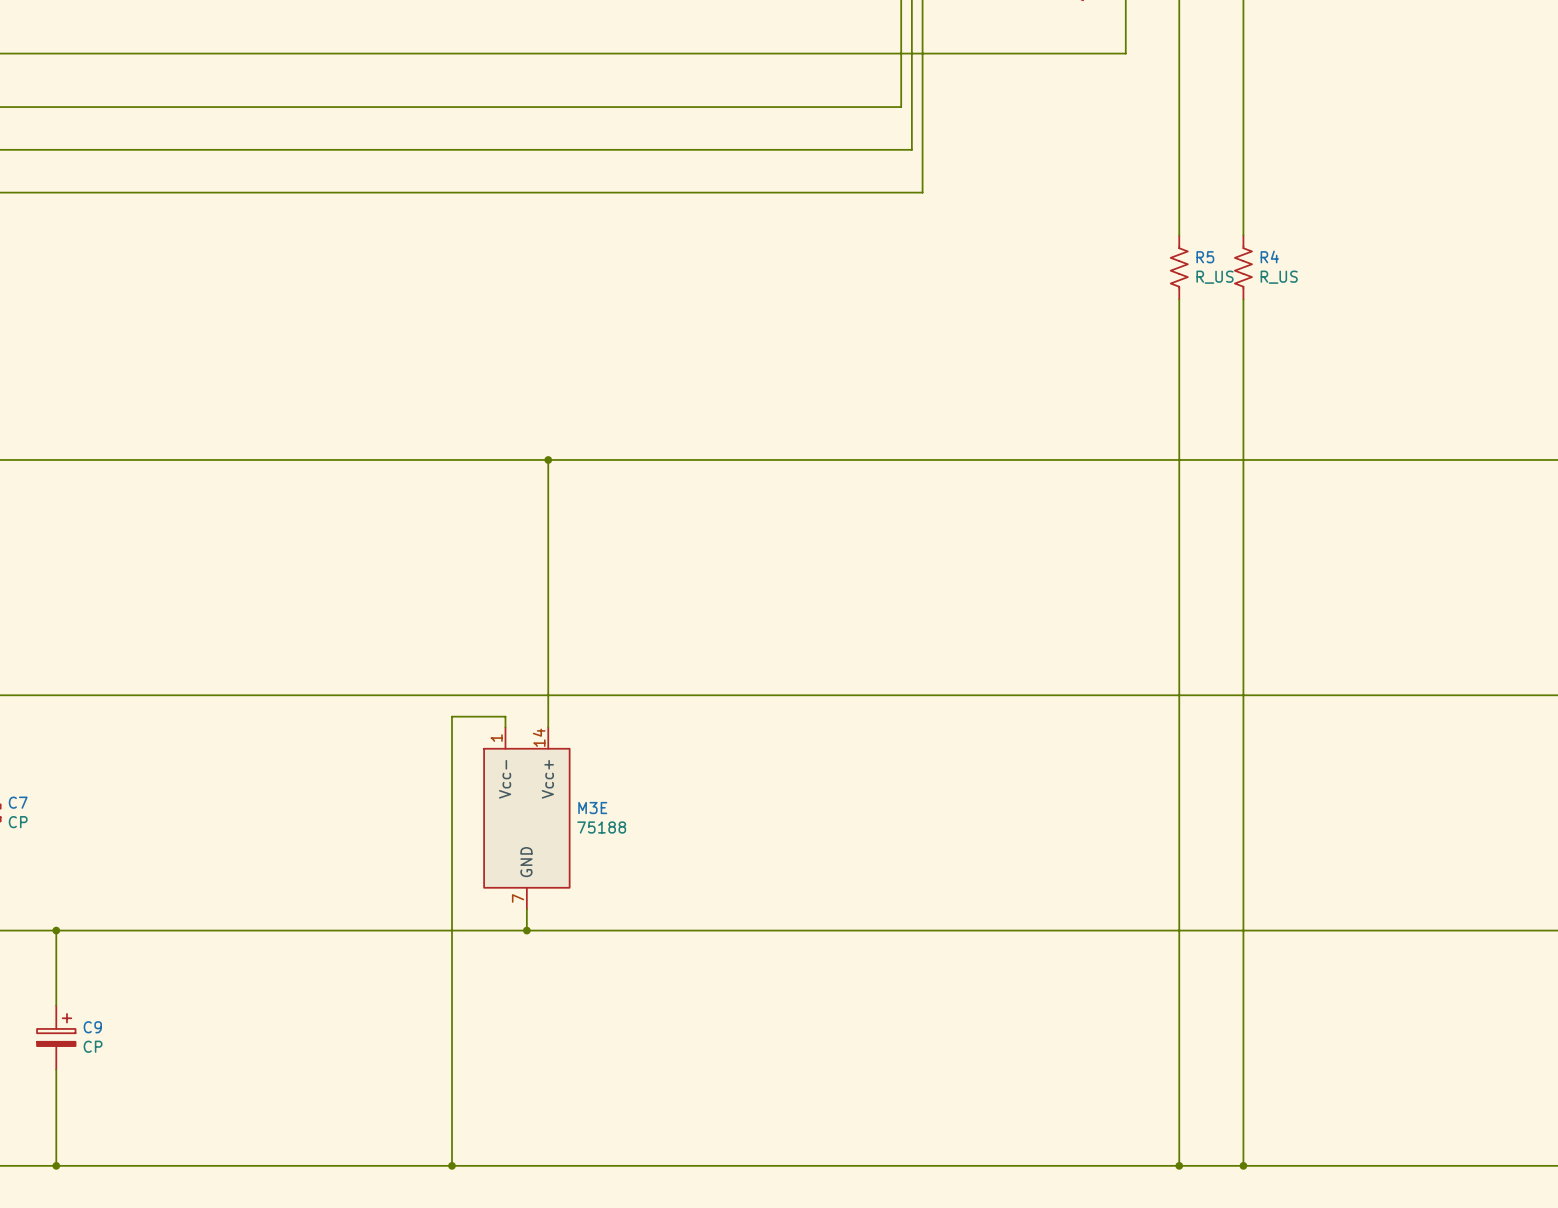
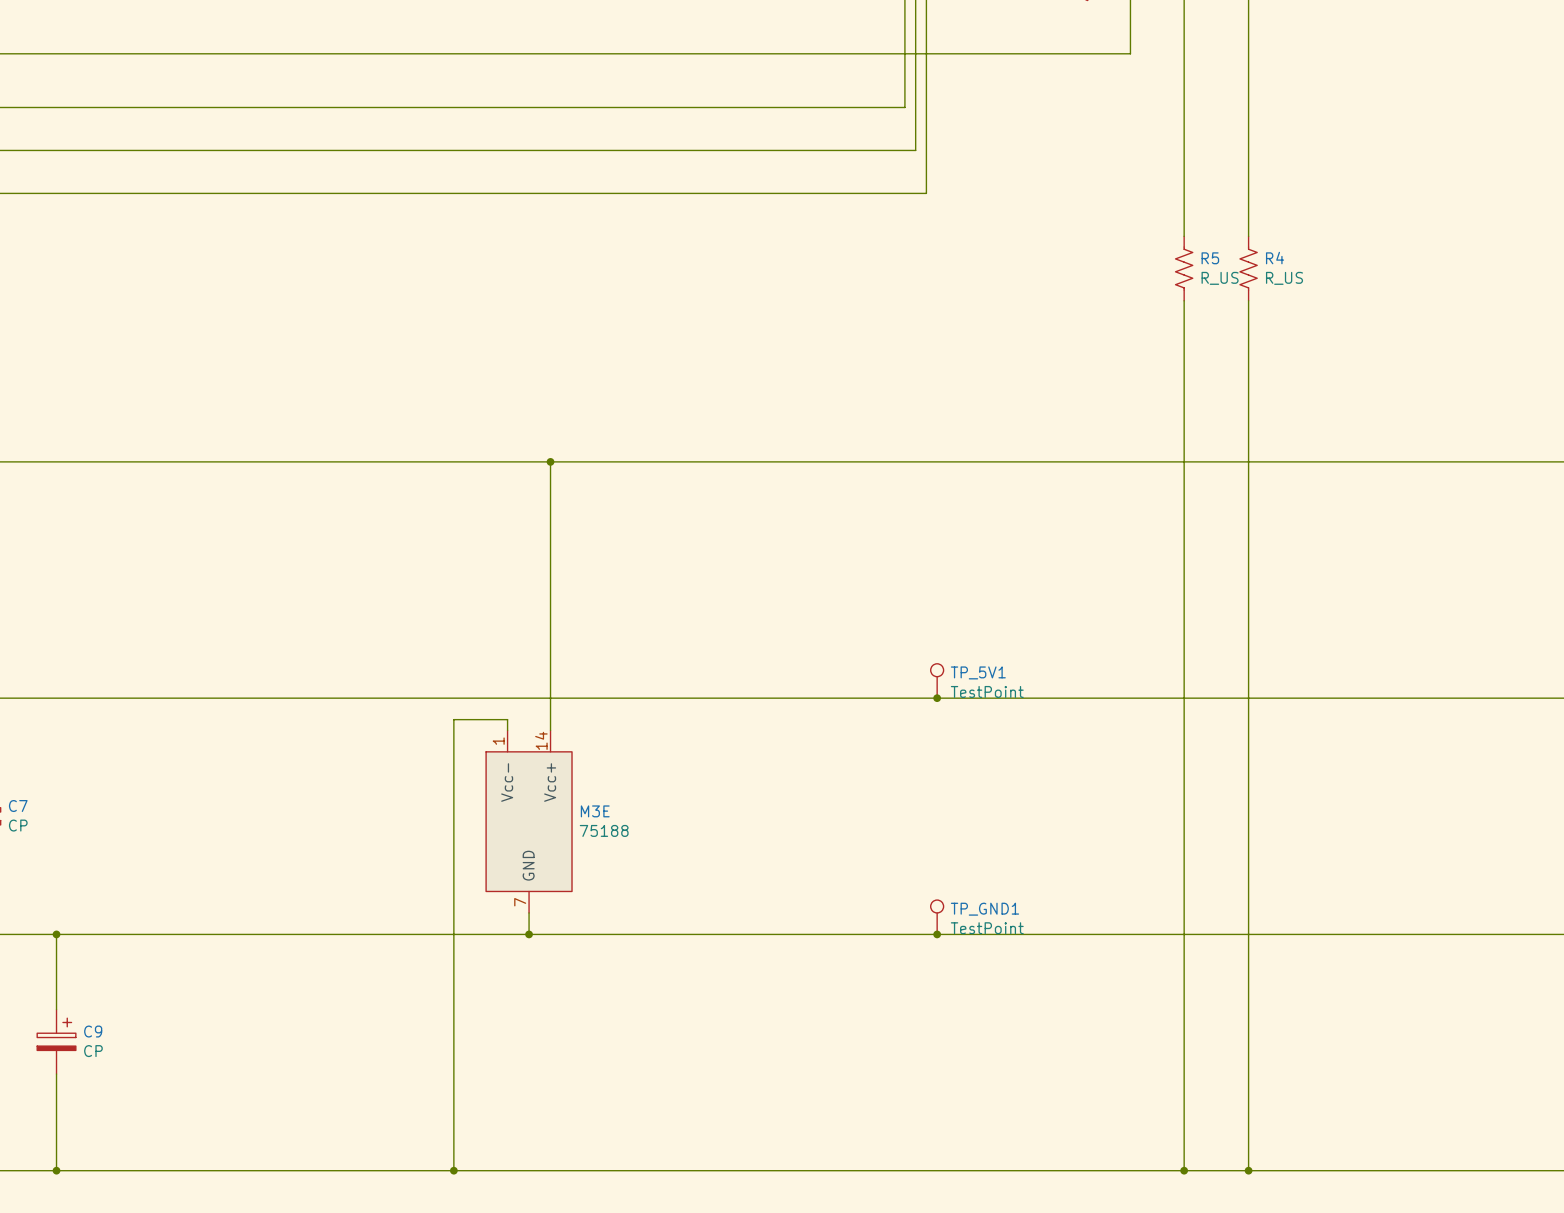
TP_5V1: none -> TestPoint (937, 680)
junction: none -> (937, 698)
TP_GND1: none -> TestPoint (937, 917)
junction: none -> (937, 934)

